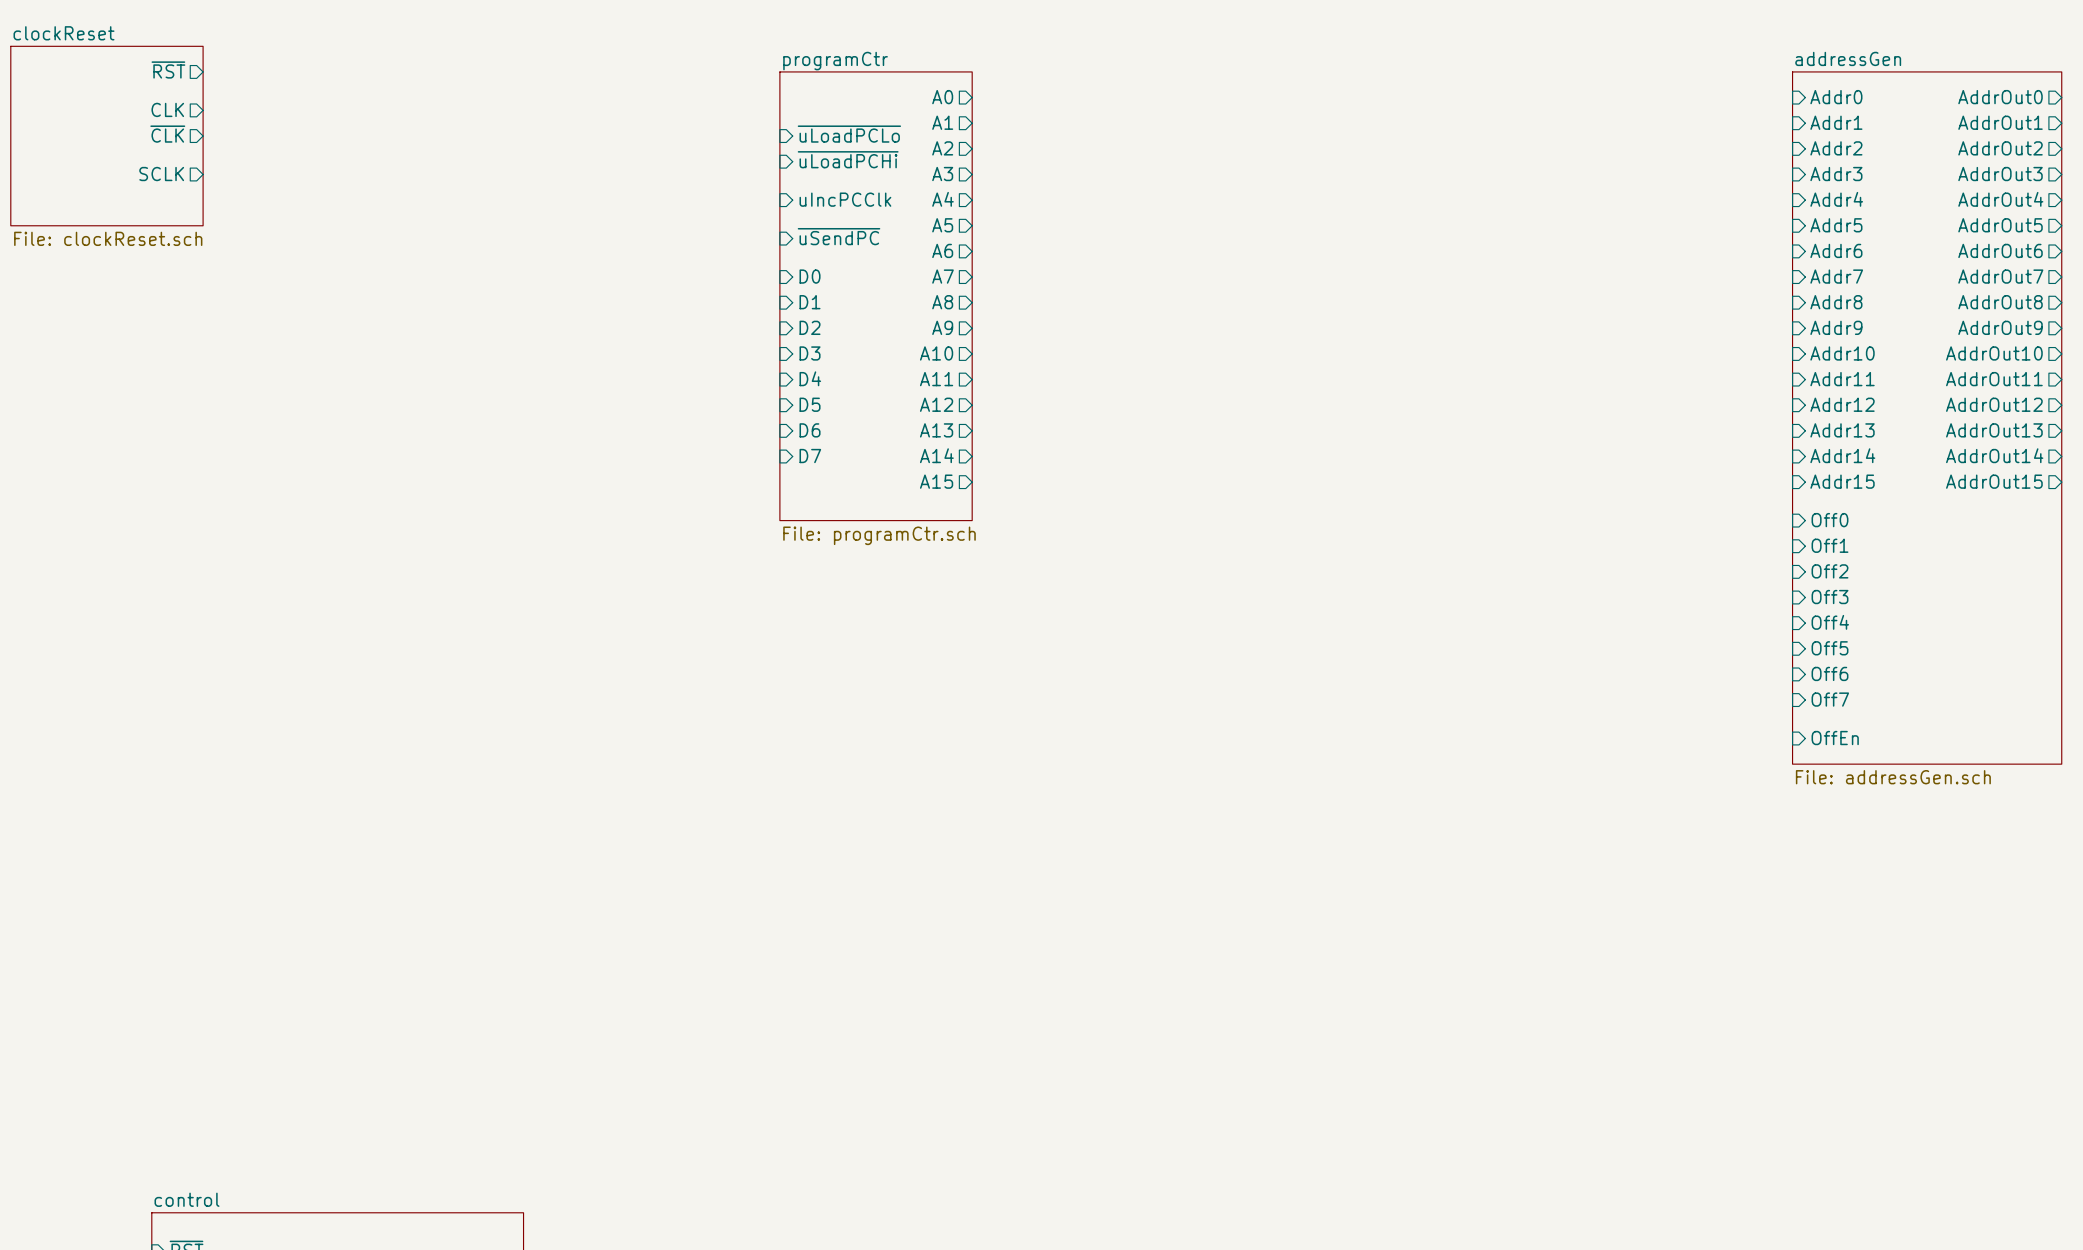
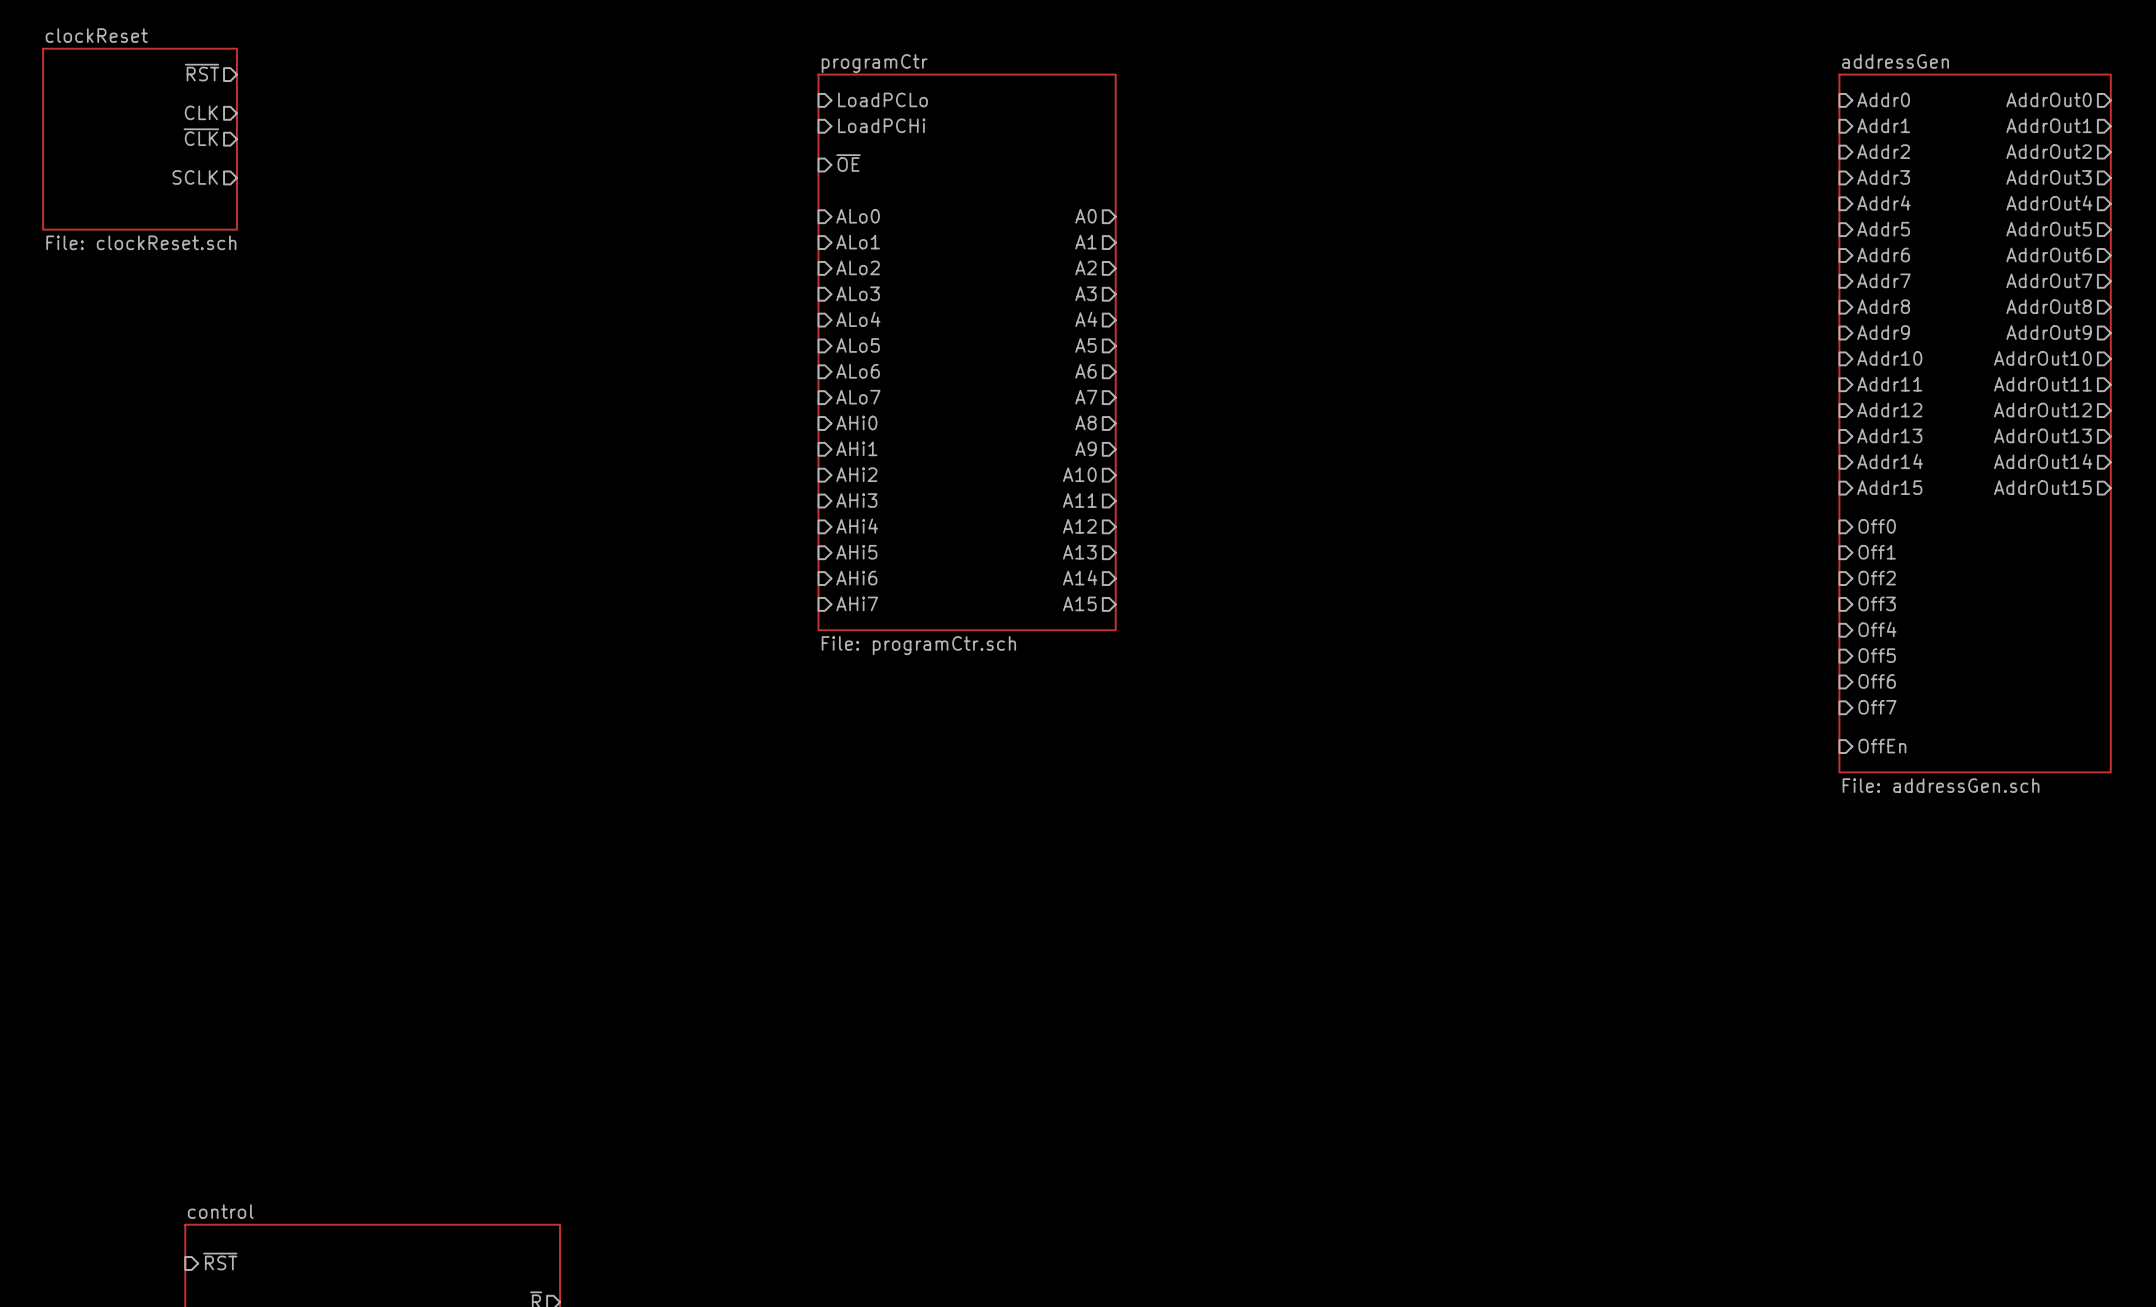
sheet pin: none -> LoadPCLo (883, 99)
sheet pin position: A0 (942, 97) -> A0 (1085, 216)
sheet pin: none -> LoadPCHi (881, 125)
sheet pin position: A1 (942, 122) -> A1 (1085, 242)
sheet pin: ~{uLoadPCLo} (849, 134) -> none
sheet pin position: A2 (942, 148) -> A2 (1085, 267)
sheet pin: ~{uLoadPCHi} (848, 159) -> ~{OE} (848, 163)
sheet pin position: A3 (942, 174) -> A3 (1085, 293)
sheet pin: uIncPCClk (845, 199) -> none
sheet pin position: A4 (942, 199) -> A4 (1086, 319)
sheet pin: none -> ALo0 (858, 216)
sheet pin position: A5 (942, 225) -> A5 (1085, 345)
sheet pin: ~{uSendPC} (839, 236) -> ALo1 (858, 242)
sheet pin position: A6 (942, 250) -> A6 (1085, 371)
sheet pin: none -> ALo2 (858, 267)
sheet pin: D0 (810, 276) -> none
sheet pin position: A7 (942, 276) -> A7 (1086, 397)
sheet pin: none -> ALo3 (858, 293)
sheet programCtr: File: programCtr.sch (876, 296) -> none
sheet pin: D1 (810, 302) -> none
sheet pin position: A8 (942, 302) -> A8 (1085, 423)
sheet pin: none -> ALo4 (858, 319)
sheet pin: D2 (810, 327) -> none
sheet pin position: A9 (942, 327) -> A9 (1085, 448)
sheet pin: none -> ALo5 (858, 345)
sheet programCtr: none -> File: programCtr.sch (967, 352)
sheet pin: D3 (810, 353) -> none
sheet pin position: A10 (936, 353) -> A10 (1079, 474)
sheet pin: none -> ALo6 (858, 371)
sheet pin: D4 (810, 378) -> none
sheet pin position: A11 (936, 379) -> A11 (1079, 500)
sheet pin: none -> ALo7 (858, 397)
sheet pin: D5 (810, 404) -> none
sheet pin position: A12 (936, 404) -> A12 (1079, 526)
sheet pin: none -> AHi0 (856, 423)
sheet pin: D6 (810, 430) -> none
sheet pin position: A13 (936, 430) -> A13 (1079, 552)
sheet pin: none -> AHi1 (856, 448)
sheet pin position: A14 (936, 455) -> A14 (1080, 577)
sheet pin: D7 (810, 456) -> none
sheet pin: none -> AHi2 (856, 474)
sheet pin position: A15 (936, 481) -> A15 (1079, 603)
sheet pin: none -> AHi3 (856, 500)
sheet pin: none -> AHi4 (857, 526)
sheet pin: none -> AHi5 (856, 552)
sheet pin: none -> AHi6 (856, 578)
sheet pin: none -> AHi7 (857, 603)

